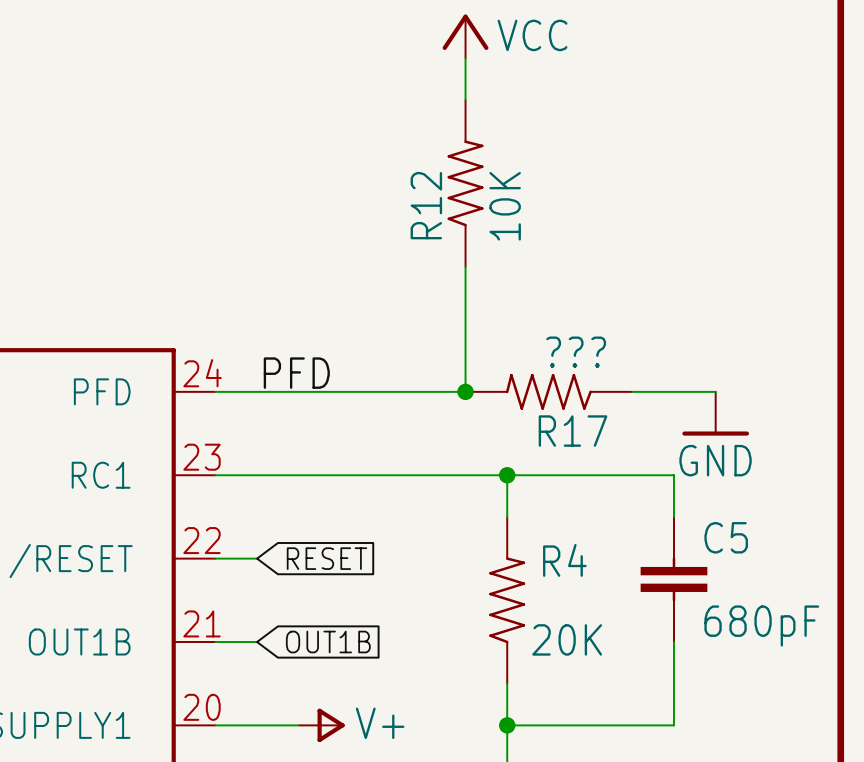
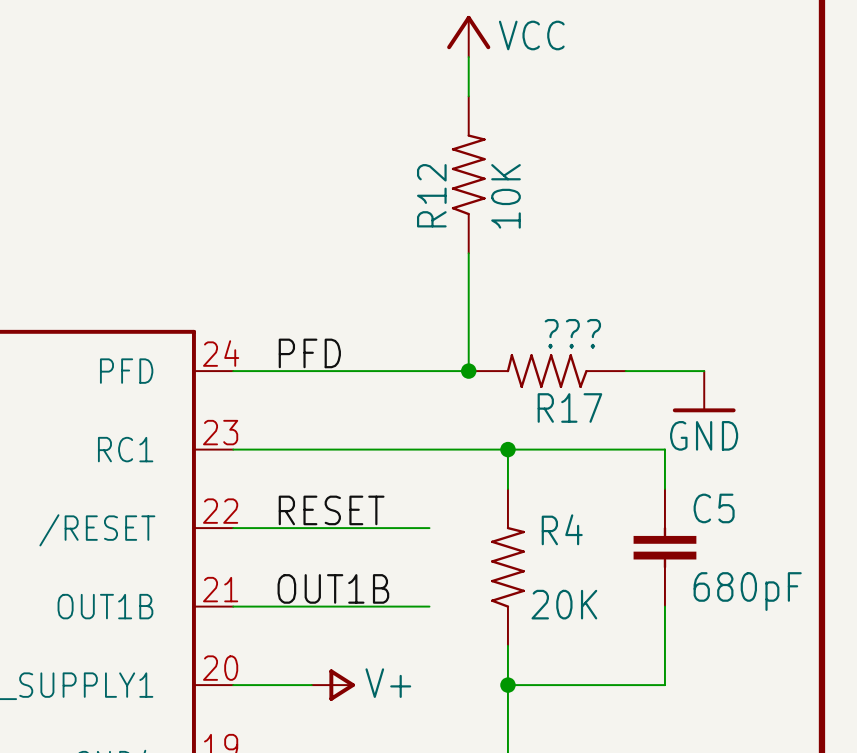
label: none -> RESET (331, 510)
wire: none -> (272, 528) (429, 528)
global label: RESET (326, 558) -> none
label: none -> OUT1B (333, 588)
wire: none -> (272, 606) (429, 606)
global label: OUT1B (328, 642) -> none

